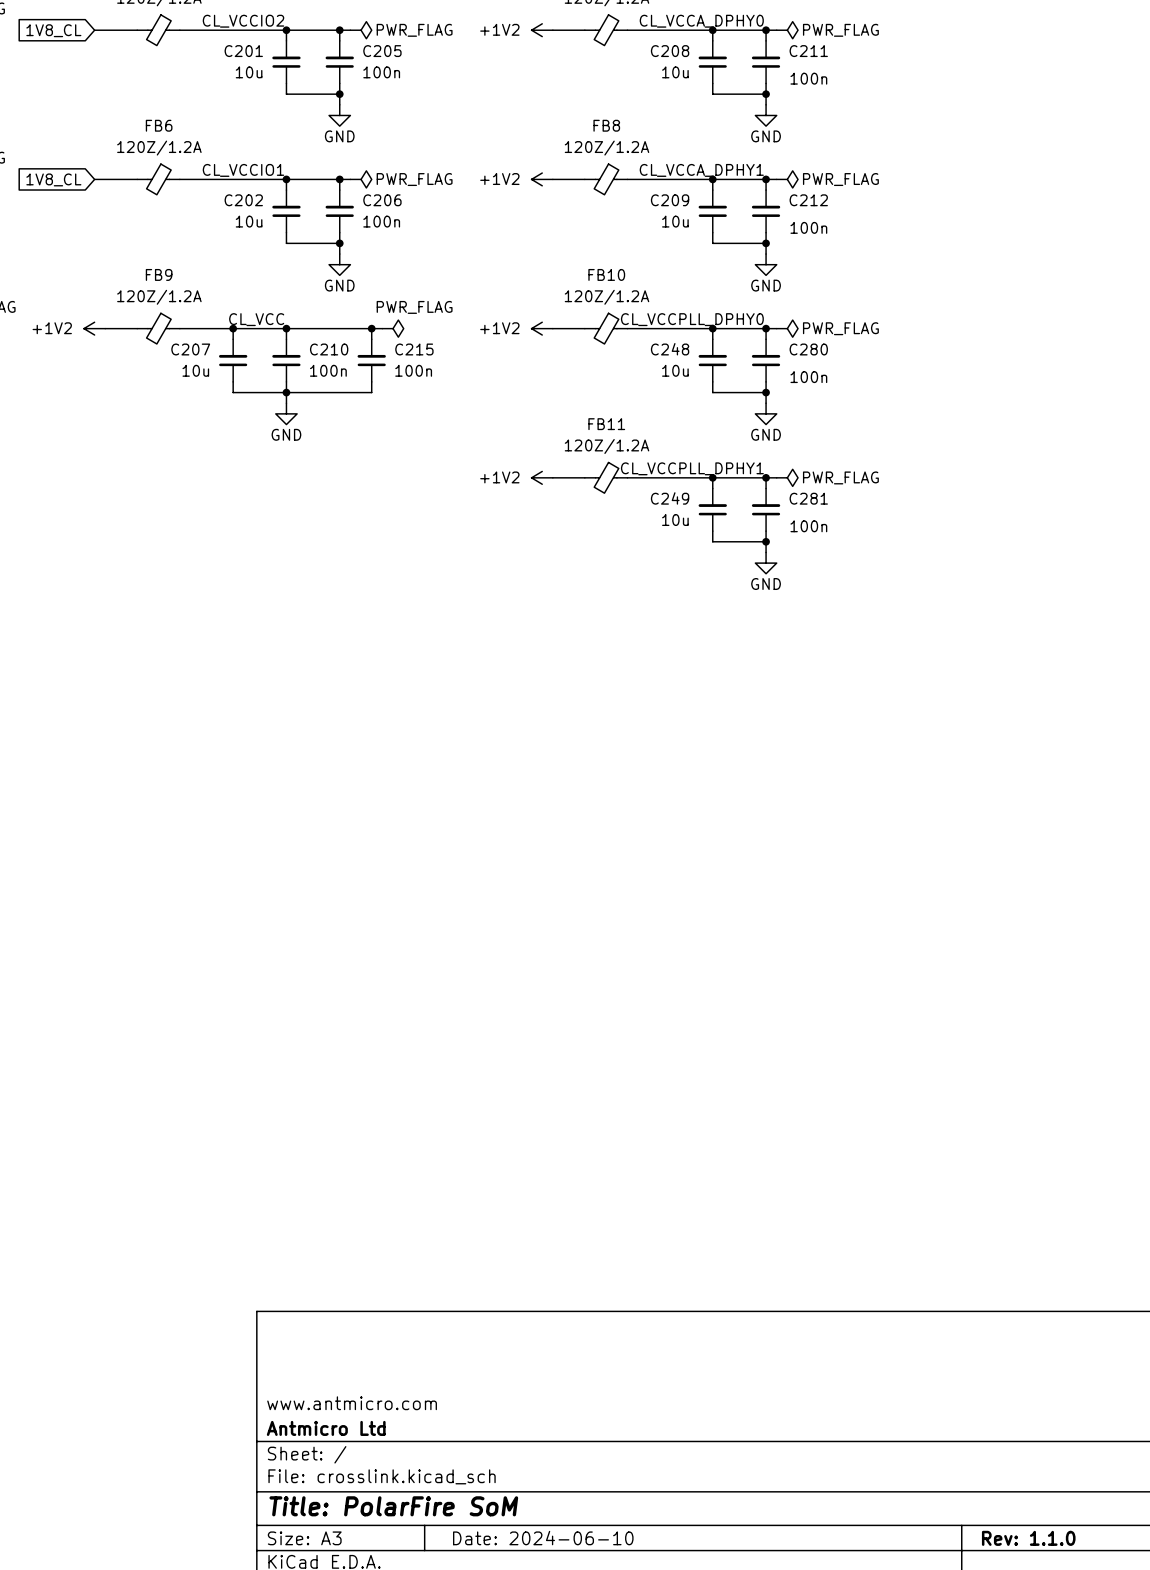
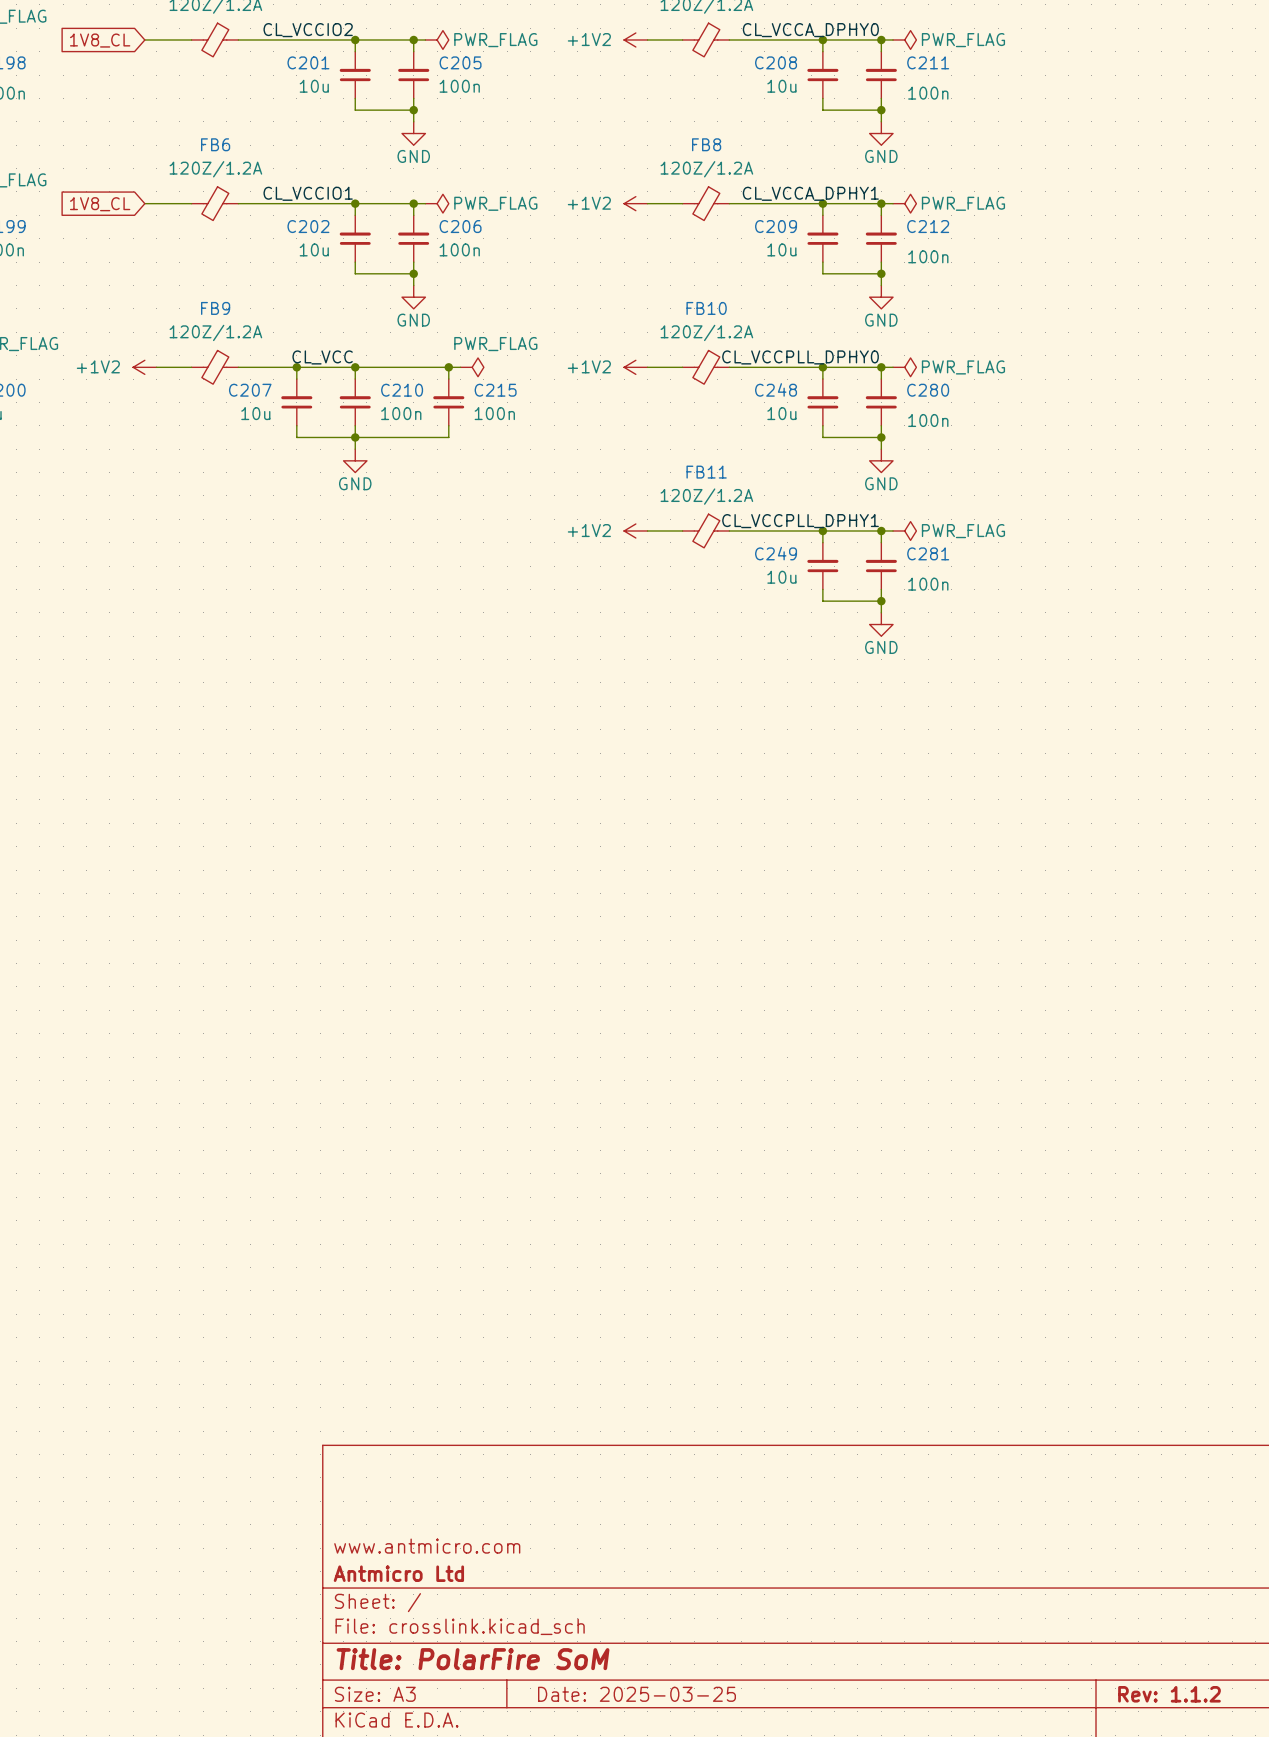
title block: Date: 2024-06-10 (543, 1538) -> Date: 2025-03-25 (636, 1694)
title block: Rev: 1.1.0 (1028, 1538) -> Rev: 1.1.2 (1169, 1694)

